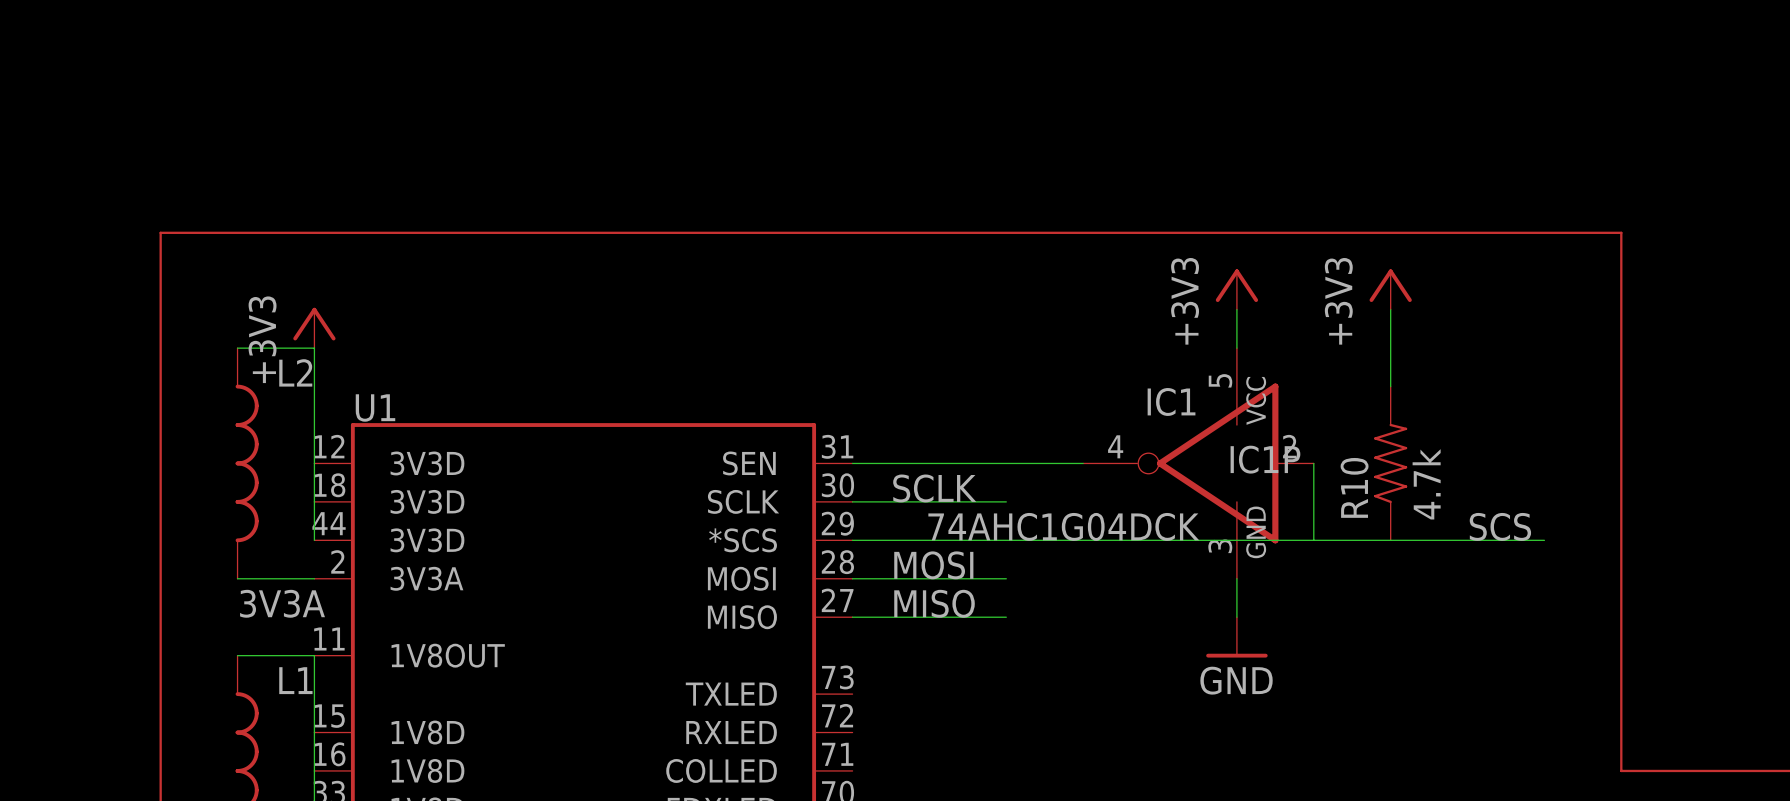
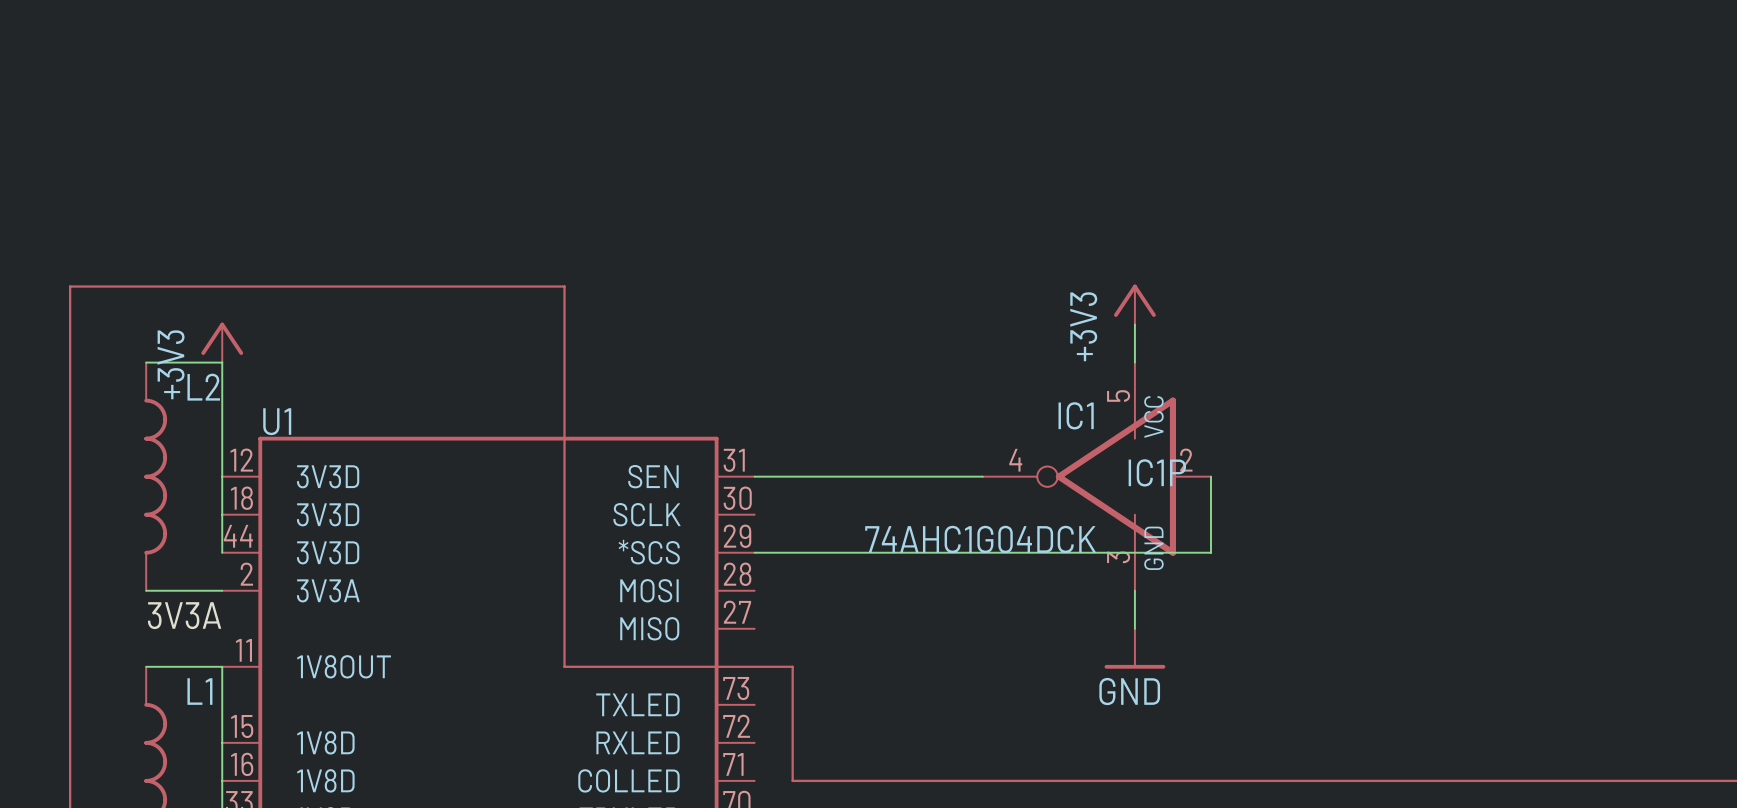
line: (160, 271) (160, 232) (1621, 232) (1621, 770) -> (70, 286) (564, 286) (564, 666) (792, 666) (792, 780) (1515, 780)
power symbol: +3V3 (1390, 289) -> none
wire: (1390, 309) (1390, 386) -> none
R10: 4.7k (1390, 463) -> none
label: SCLK (934, 488) -> none
wire: (852, 501) (1006, 501) -> none
label: SCS (1500, 526) -> none
wire: (1313, 540) (1544, 540) -> none
label: MOSI (933, 565) -> none
wire: (852, 578) (1006, 578) -> none
label: MISO (934, 603) -> none
wire: (852, 617) (1006, 617) -> none

